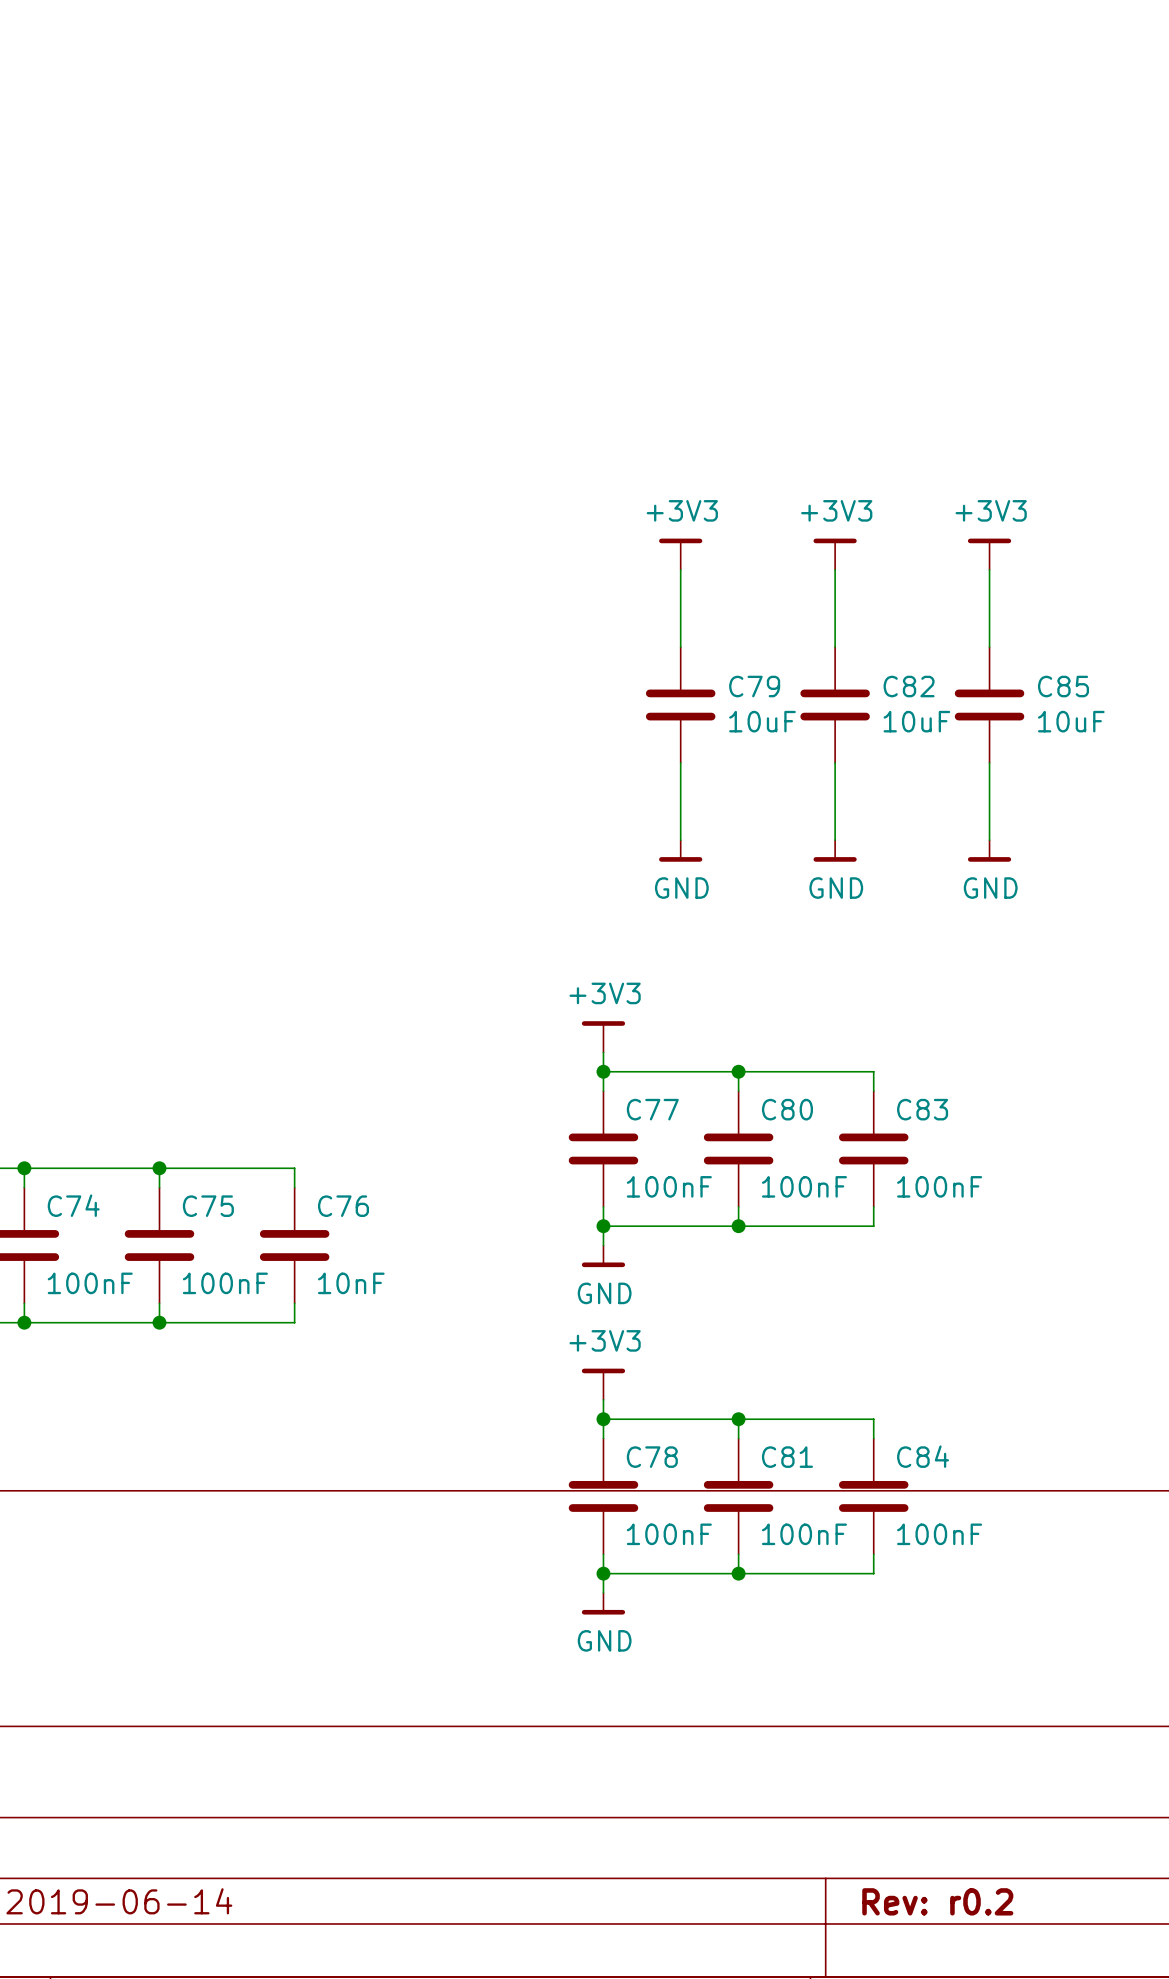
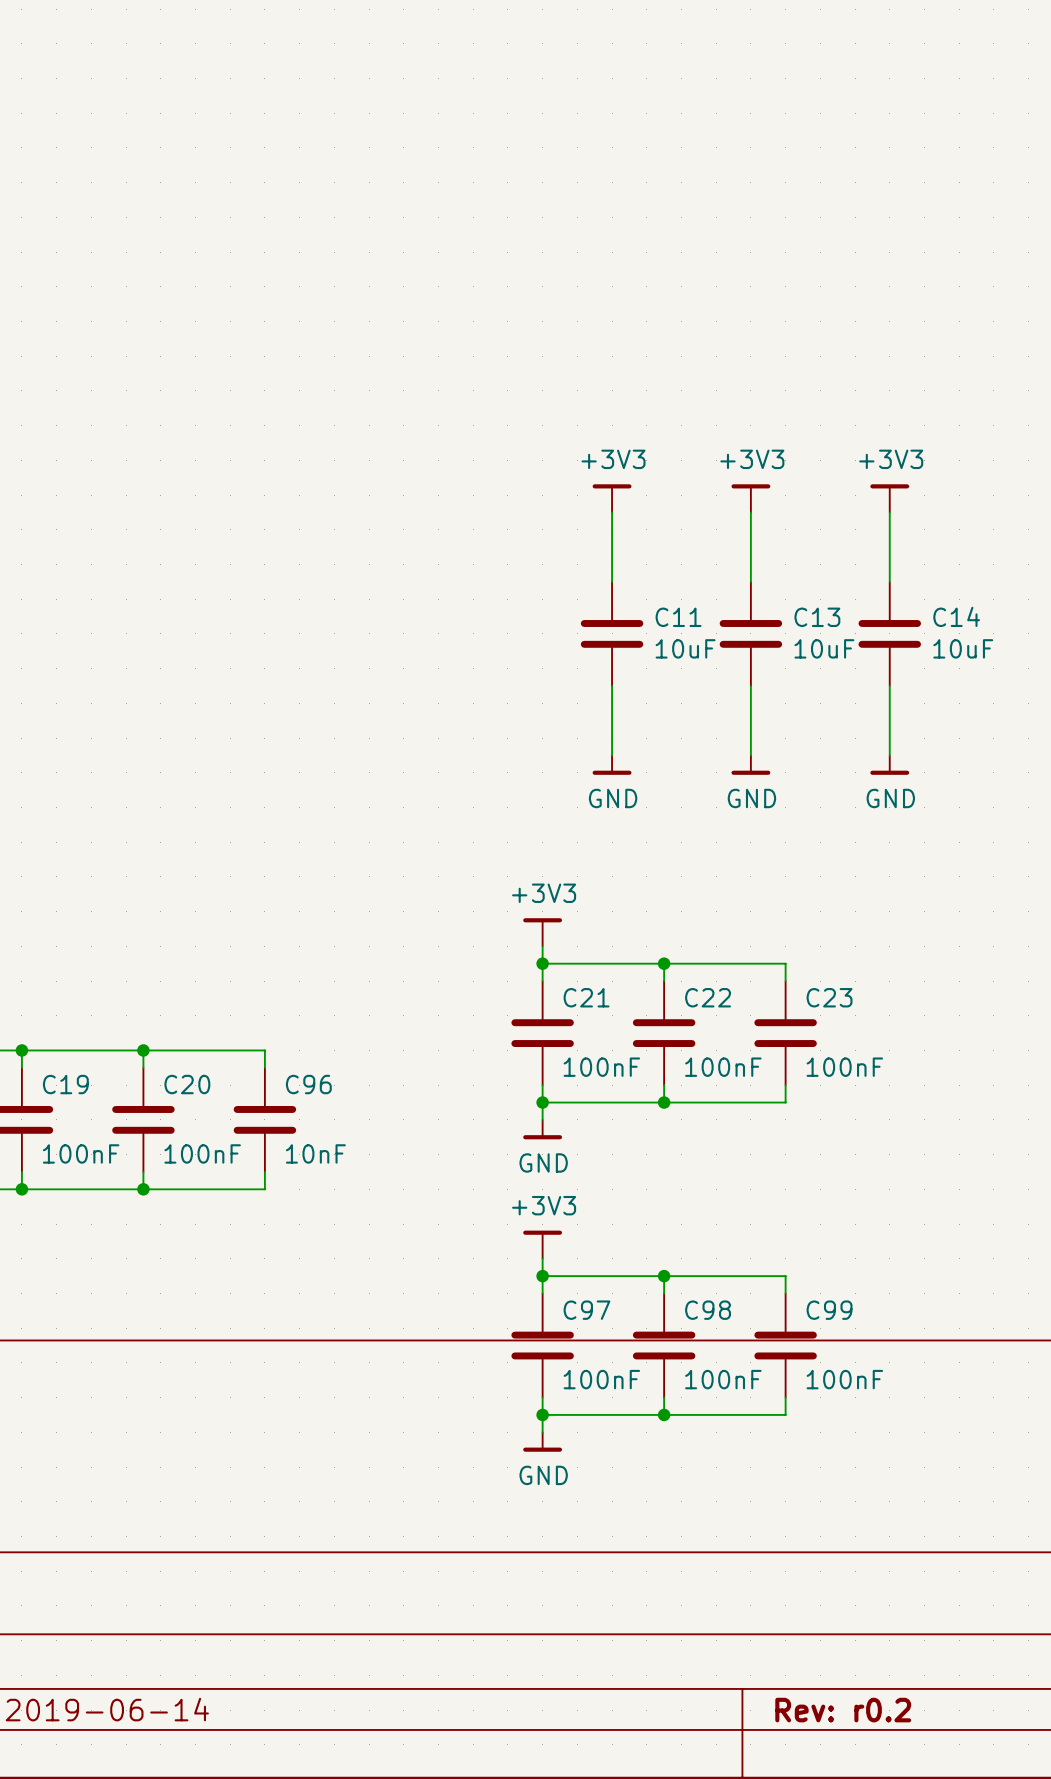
C79 name: C79 (754, 686) -> C11 (678, 617)
C82 name: C82 (909, 686) -> C13 (817, 617)
C85 name: C85 (1063, 686) -> C14 (956, 616)
C77 name: C77 (652, 1109) -> C21 (586, 997)
C80 name: C80 (787, 1109) -> C22 (708, 997)
C83 name: C83 (922, 1109) -> C23 (829, 997)
C74 name: C74 (73, 1205) -> C19 (65, 1084)
C75 name: C75 (208, 1206) -> C20 (187, 1084)
C76 name: C76 (343, 1206) -> C96 (308, 1084)
C84 name: C84 (923, 1456) -> C99 (829, 1310)
C78 name: C78 (652, 1457) -> C97 (586, 1310)
C81 name: C81 (787, 1457) -> C98 (708, 1310)

